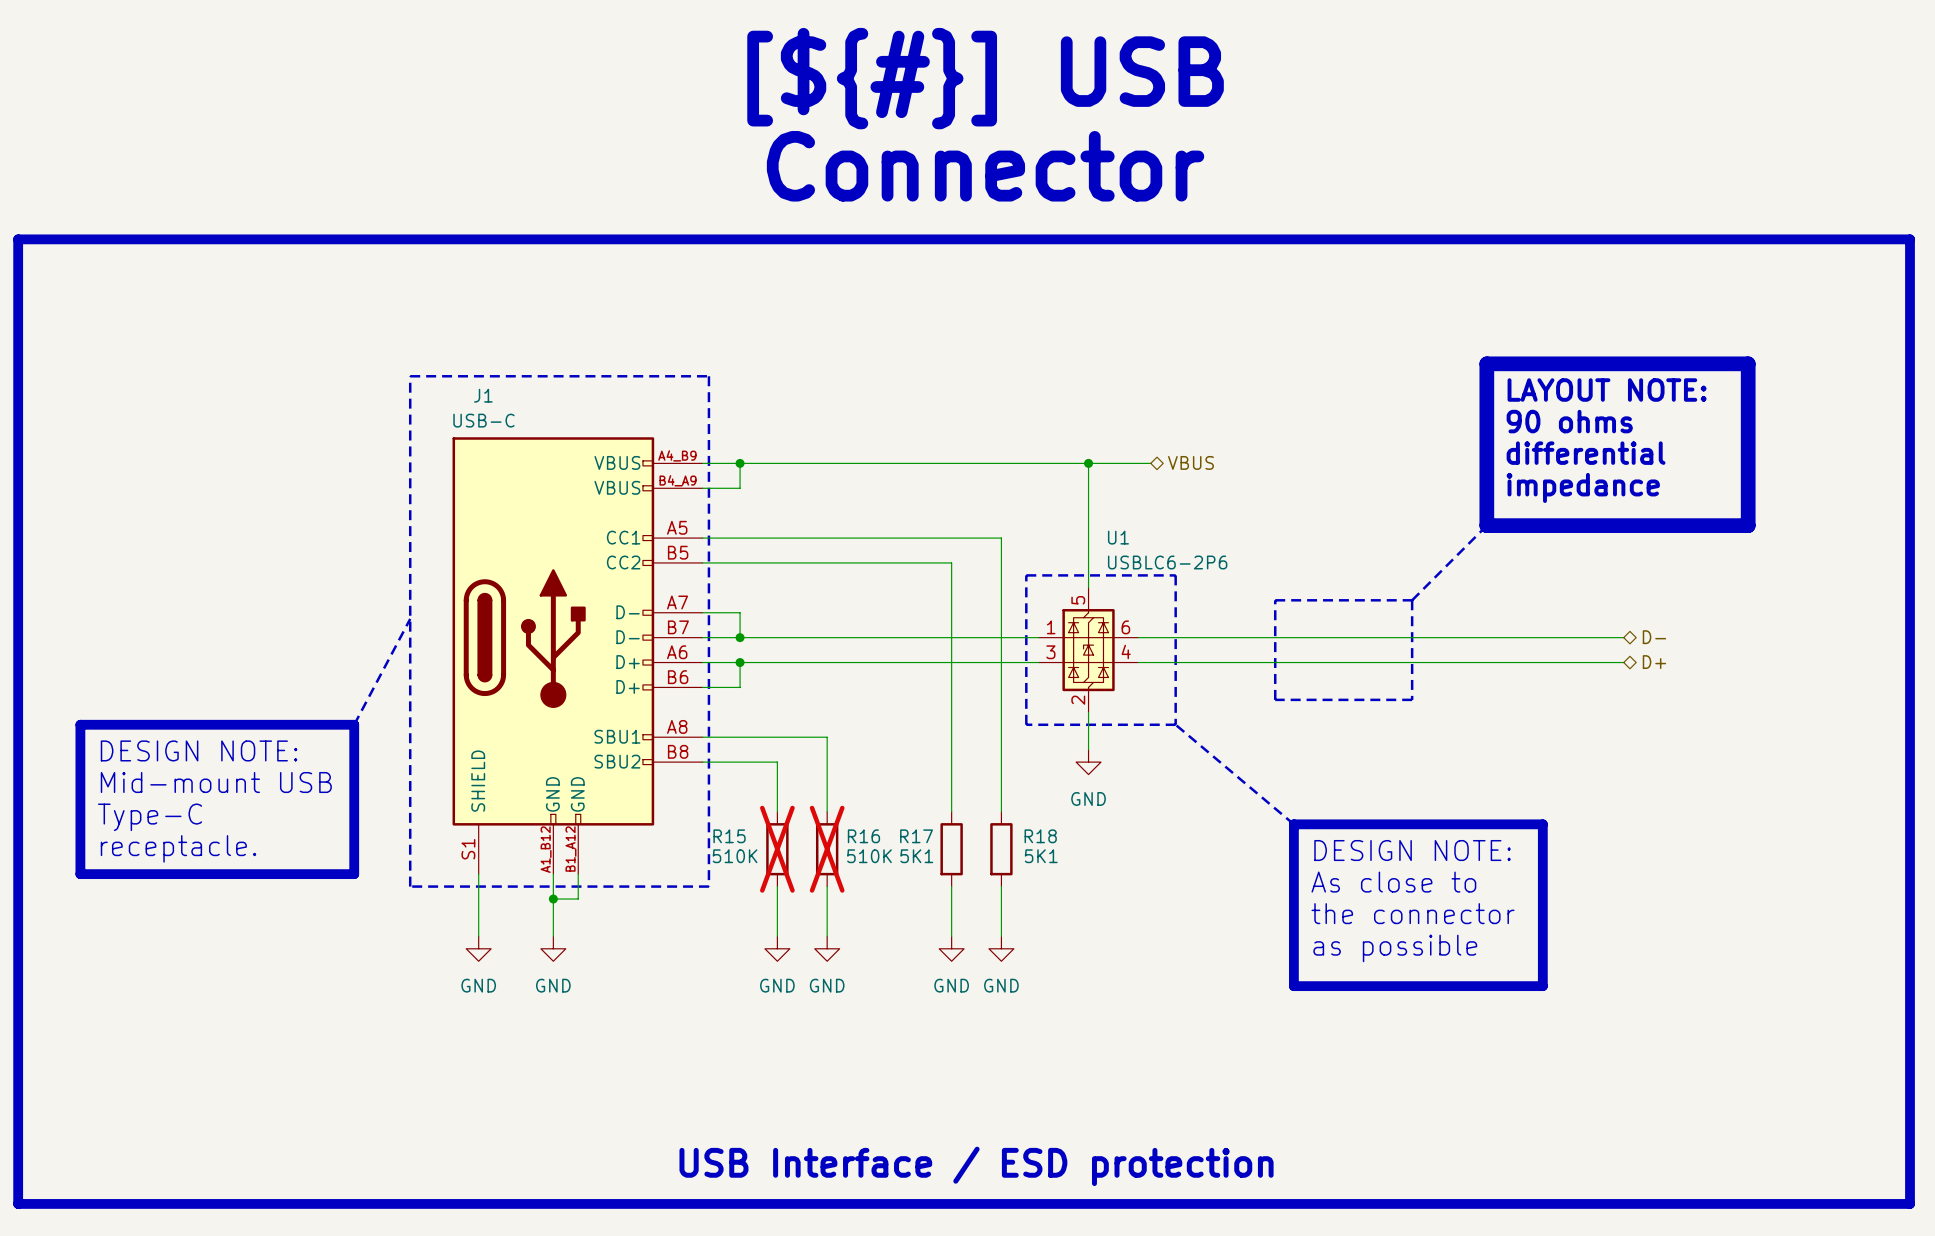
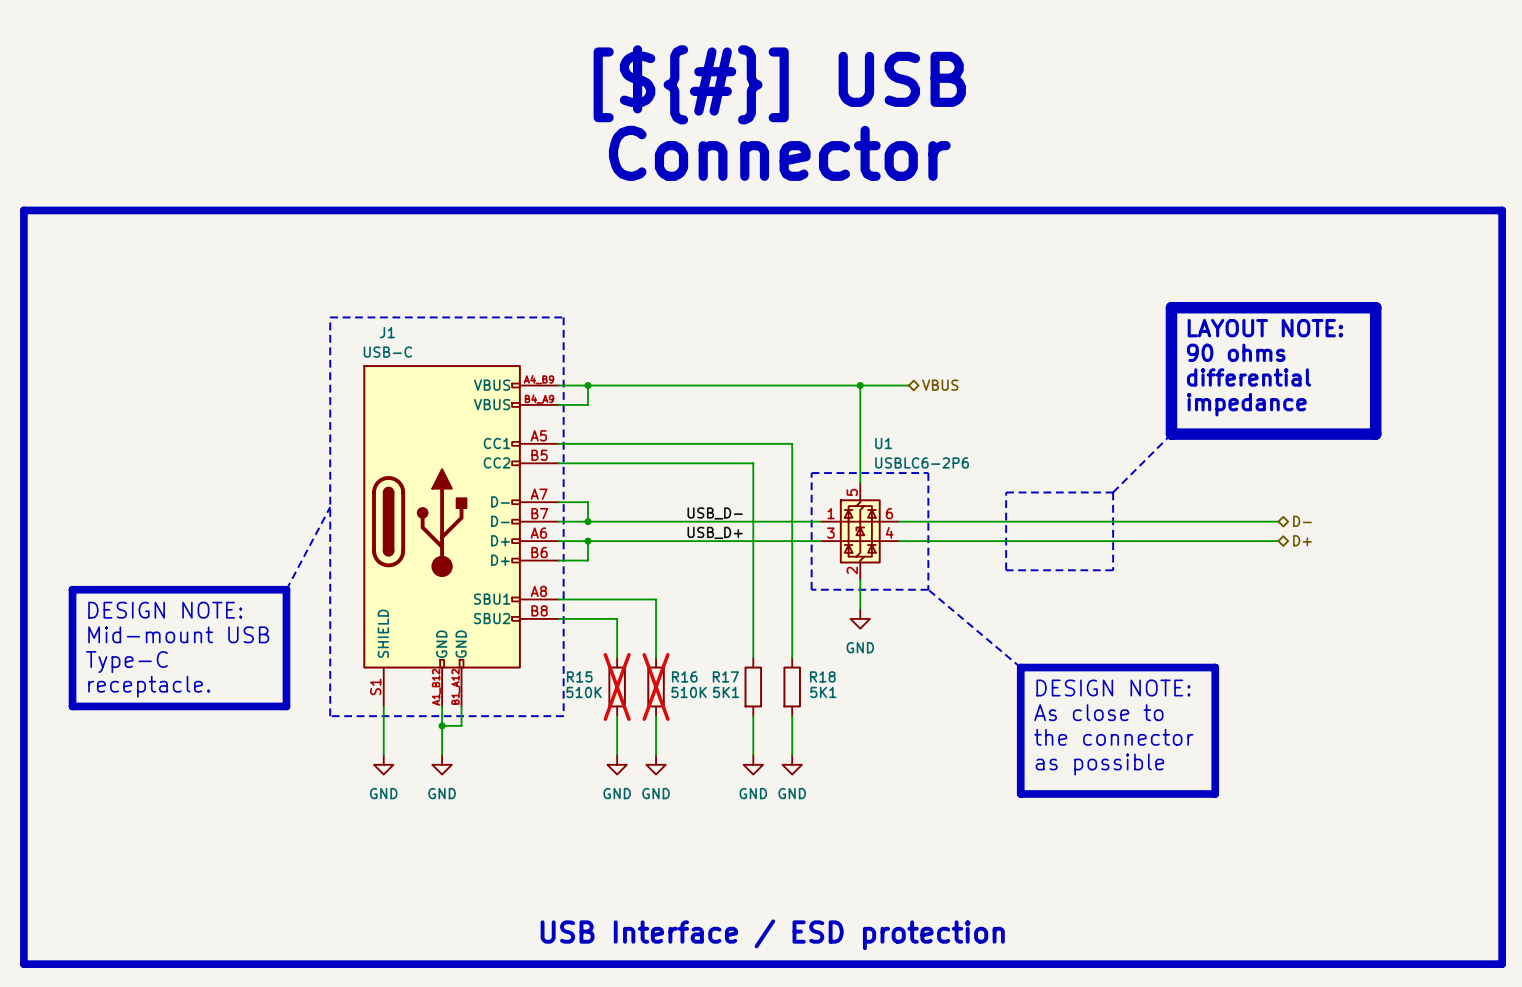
label: none -> USB_D- (715, 513)
label: none -> USB_D+ (715, 532)

